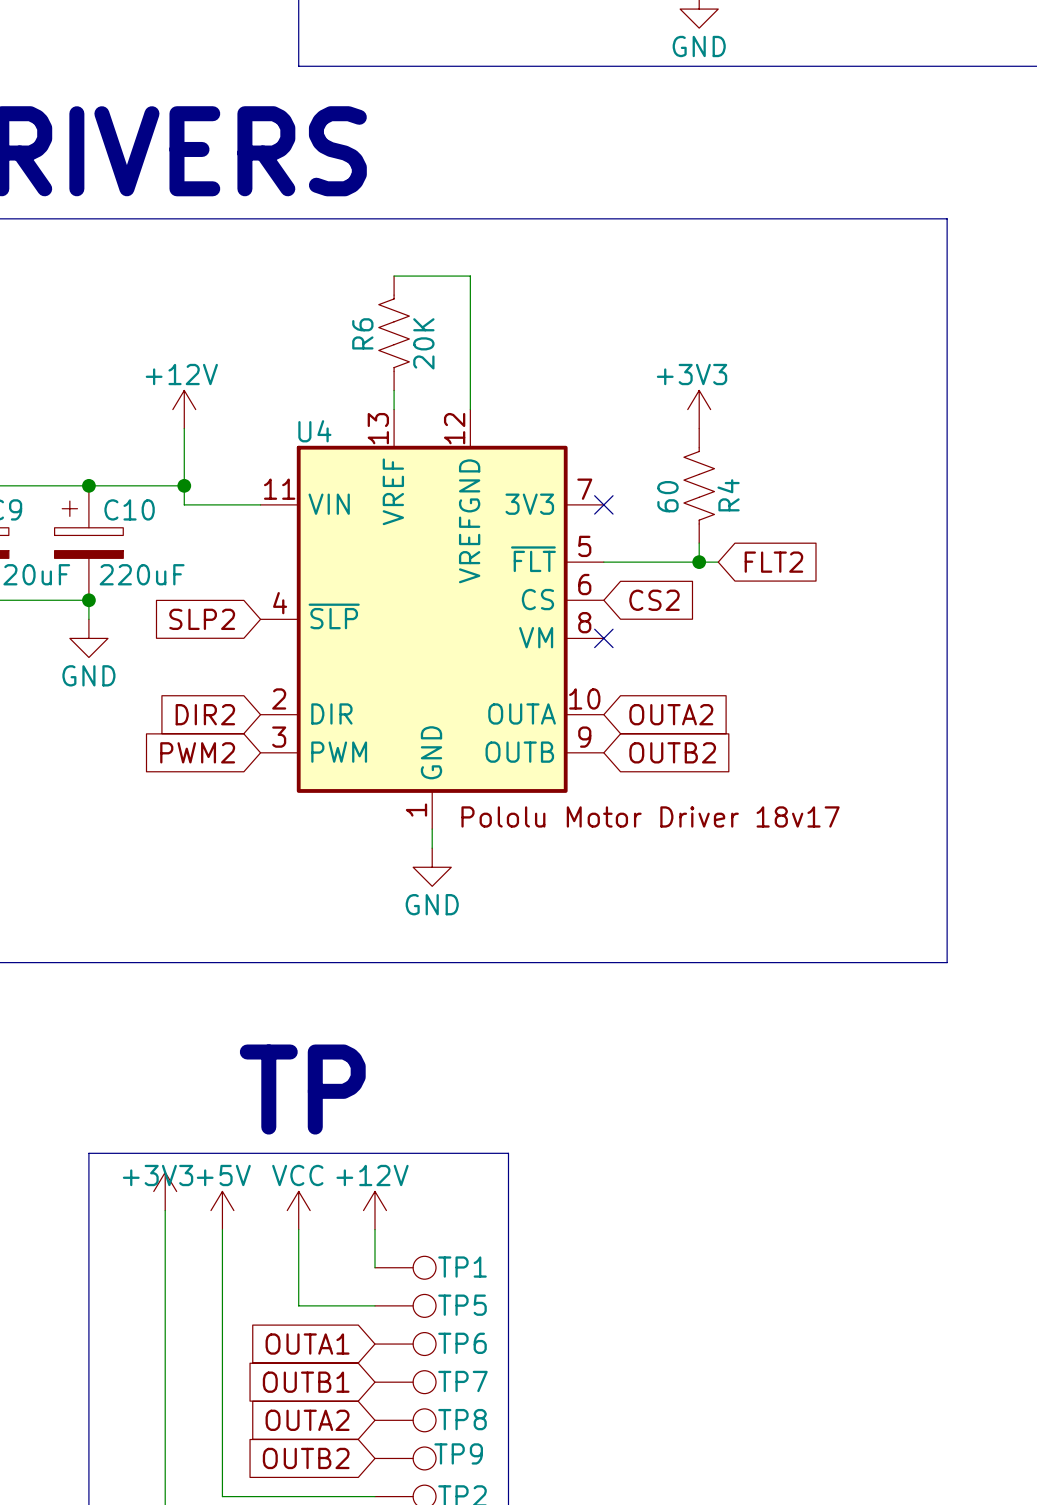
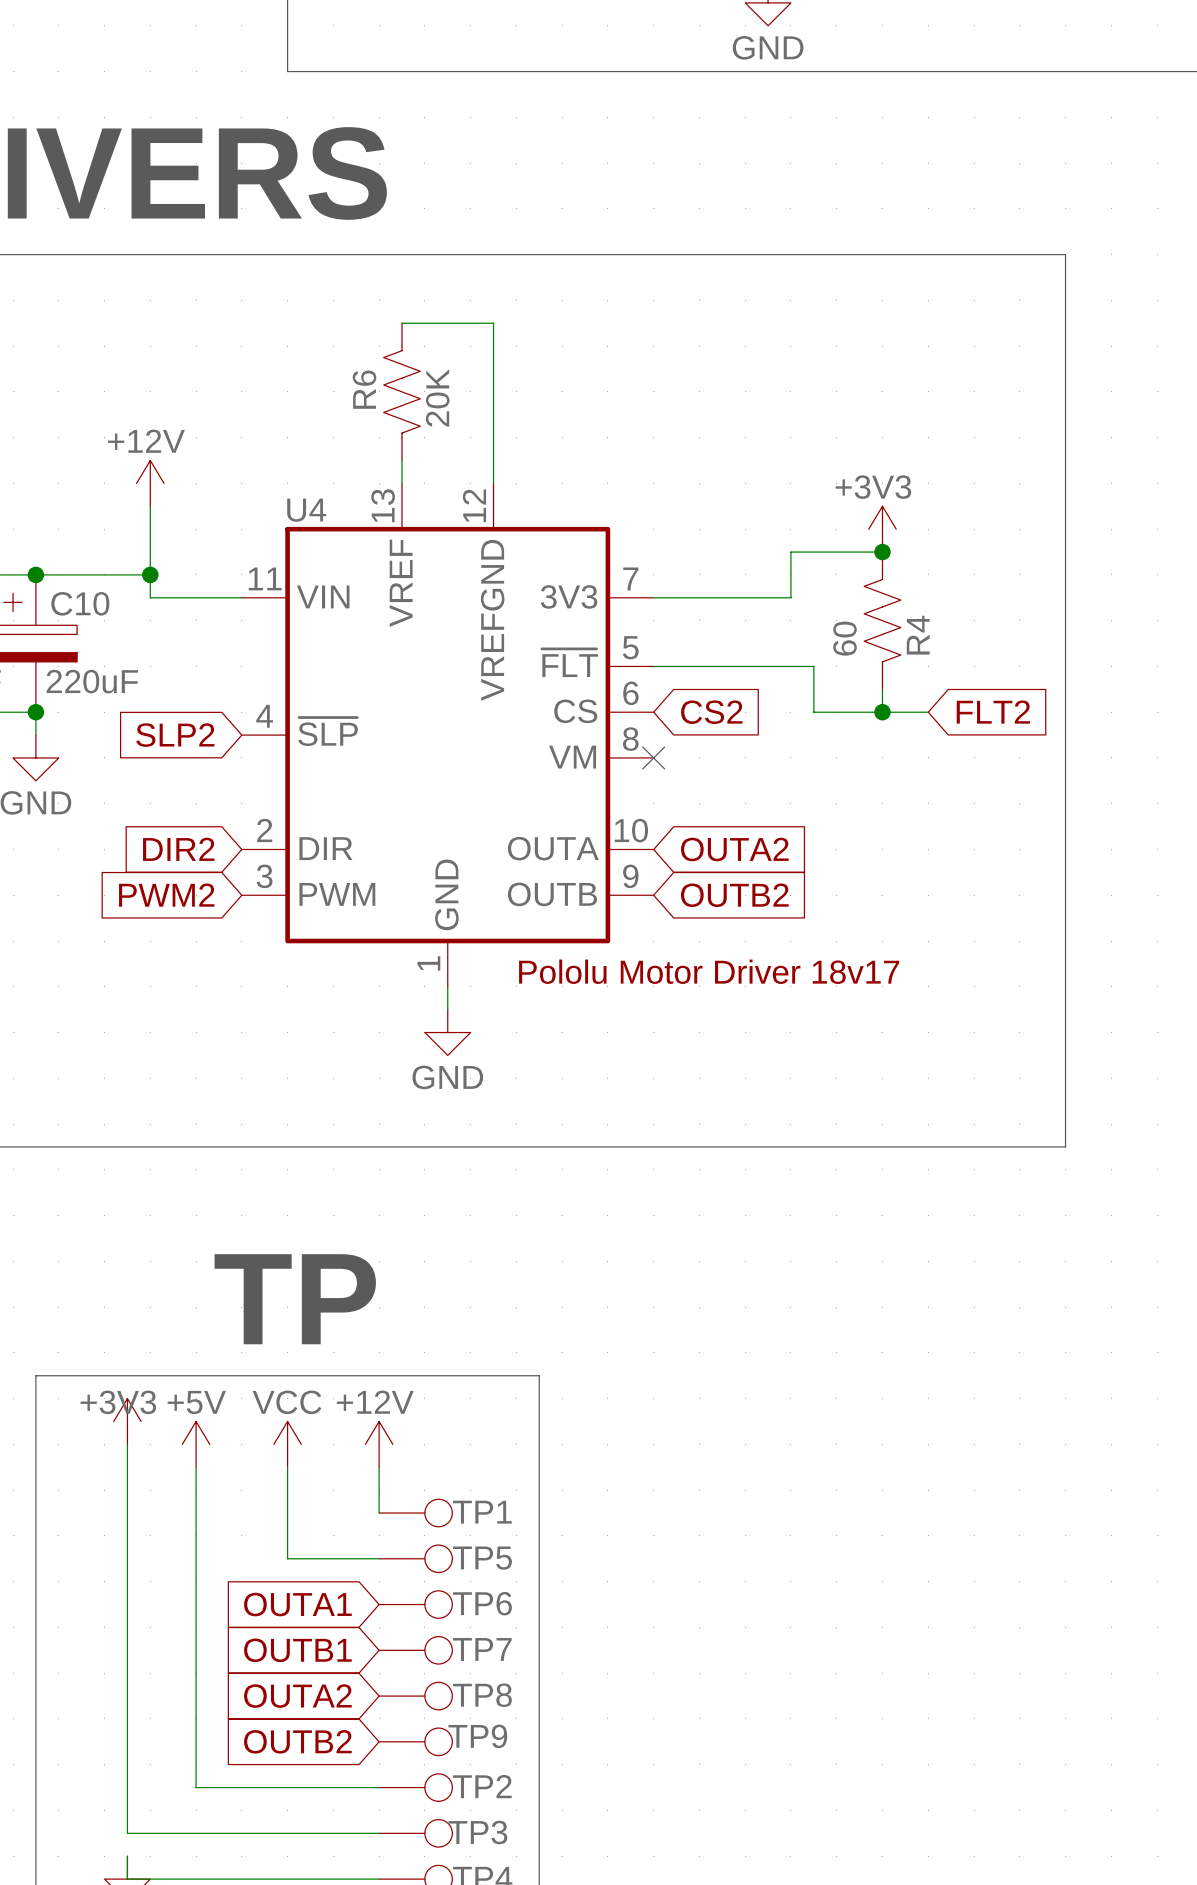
power symbol position: +3V3 (699, 409) -> +3V3 (882, 529)
wire: none -> (882, 552) (790, 552) (790, 597) (653, 597)
junction: none -> (882, 552)
R4 position: (699, 485) -> (882, 620)
no-connect mark: (603, 504) -> none
wire: (699, 543) (699, 562) -> (882, 689) (882, 712)
junction: (699, 562) -> none
wire: none -> (790, 666) (813, 666) (813, 712) (928, 712)
global label position: FLT2 (773, 562) -> FLT2 (993, 712)
junction: none -> (882, 712)

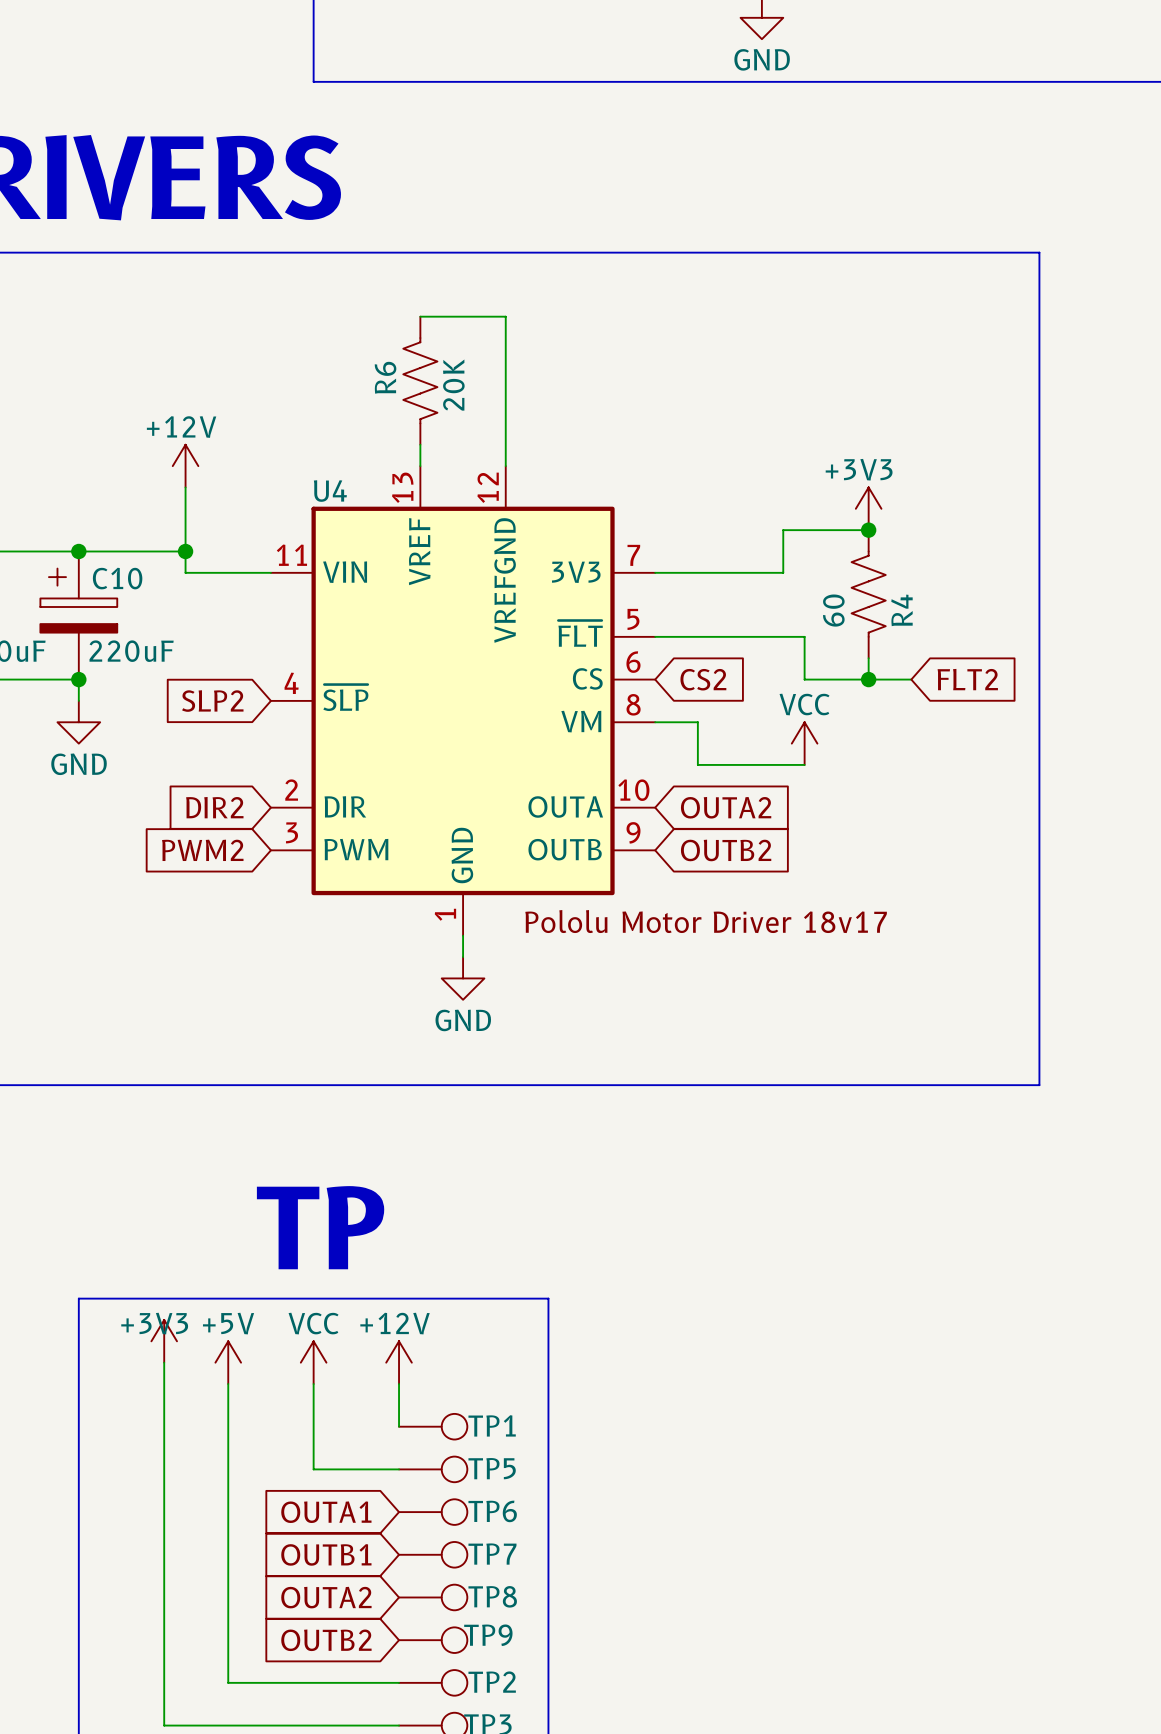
wire: none -> (655, 722) (697, 722) (697, 764) (804, 764)
no-connect mark: (653, 757) -> none
power symbol: none -> VCC (804, 743)

